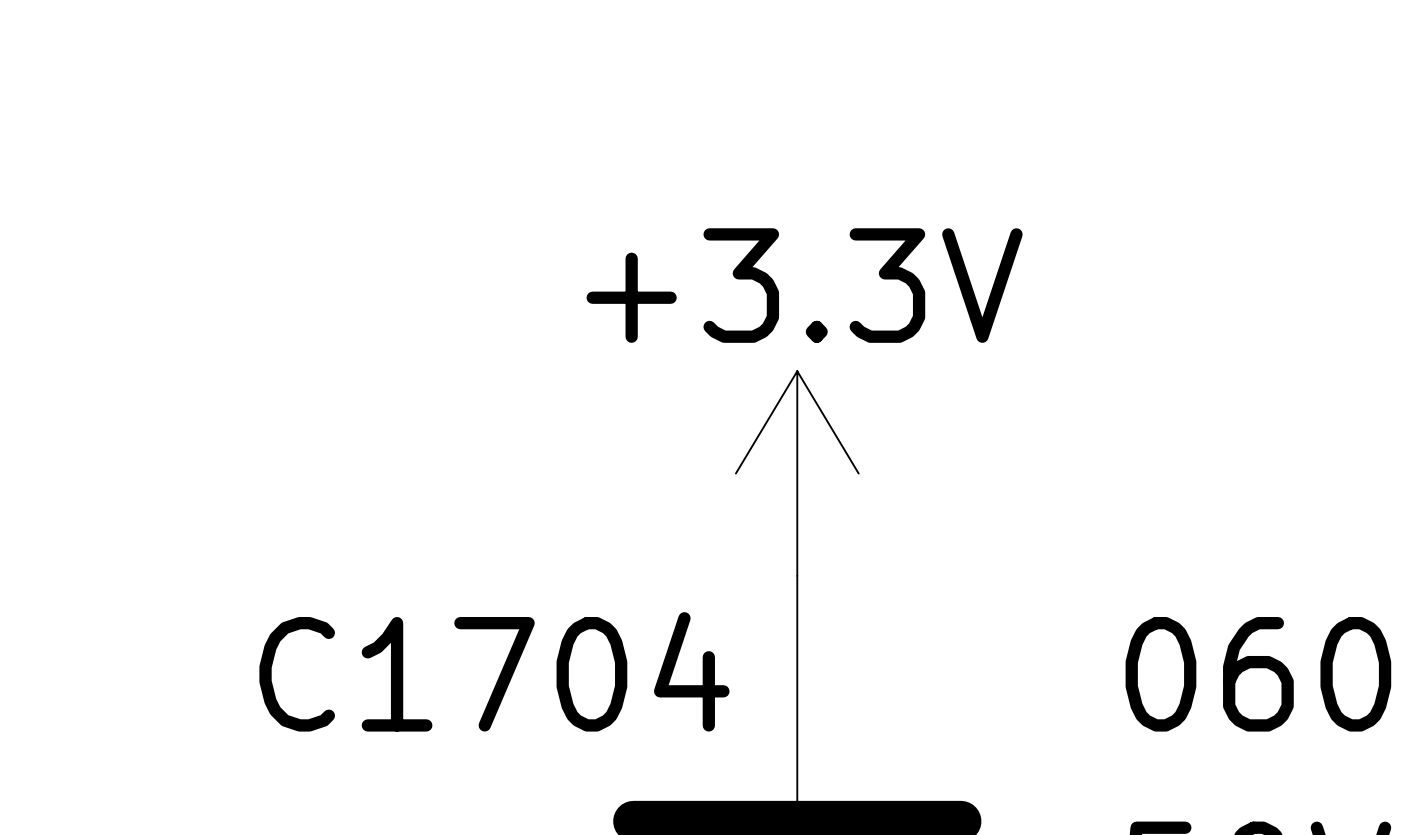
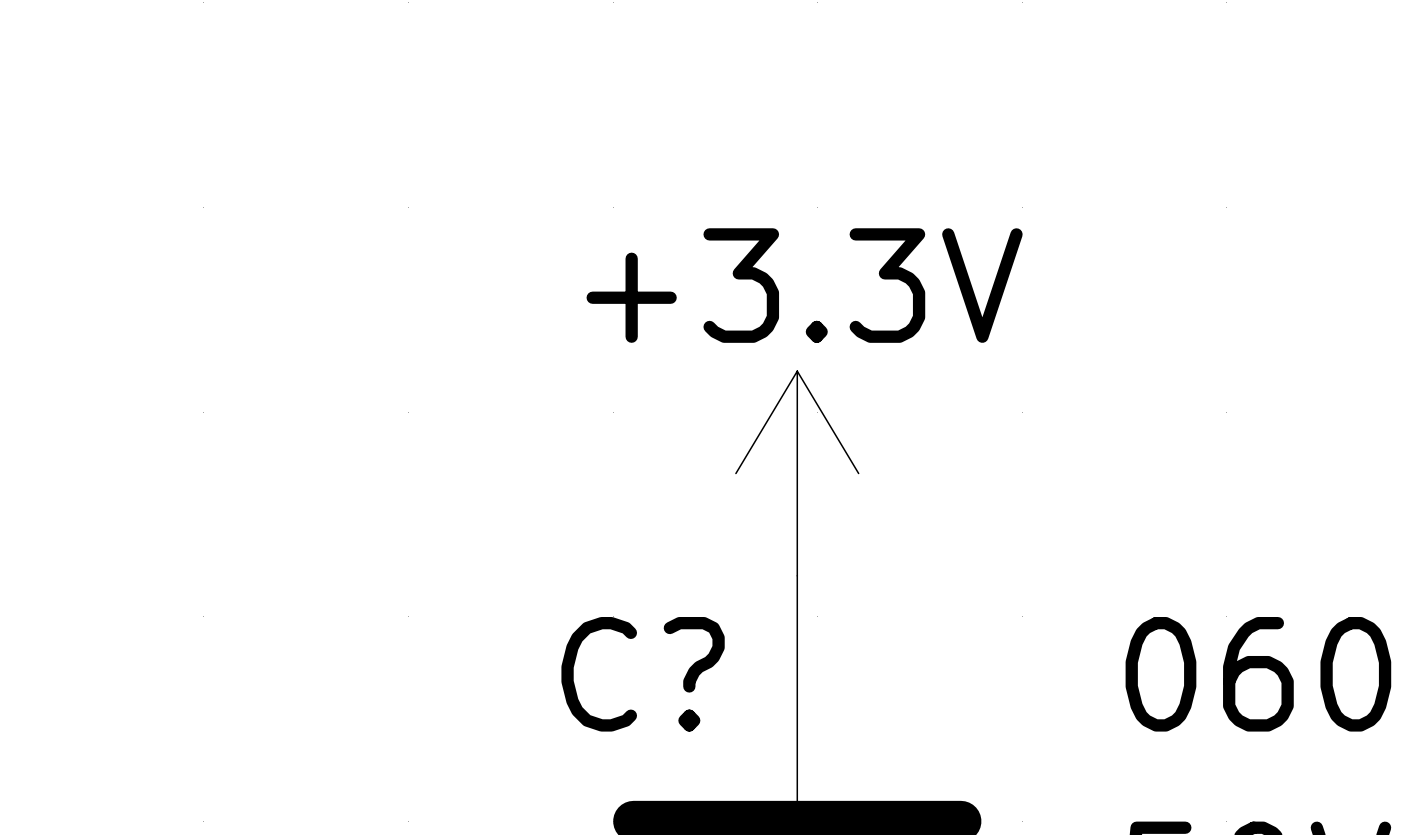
C1704 name: C1704 (494, 671) -> C? (643, 674)

